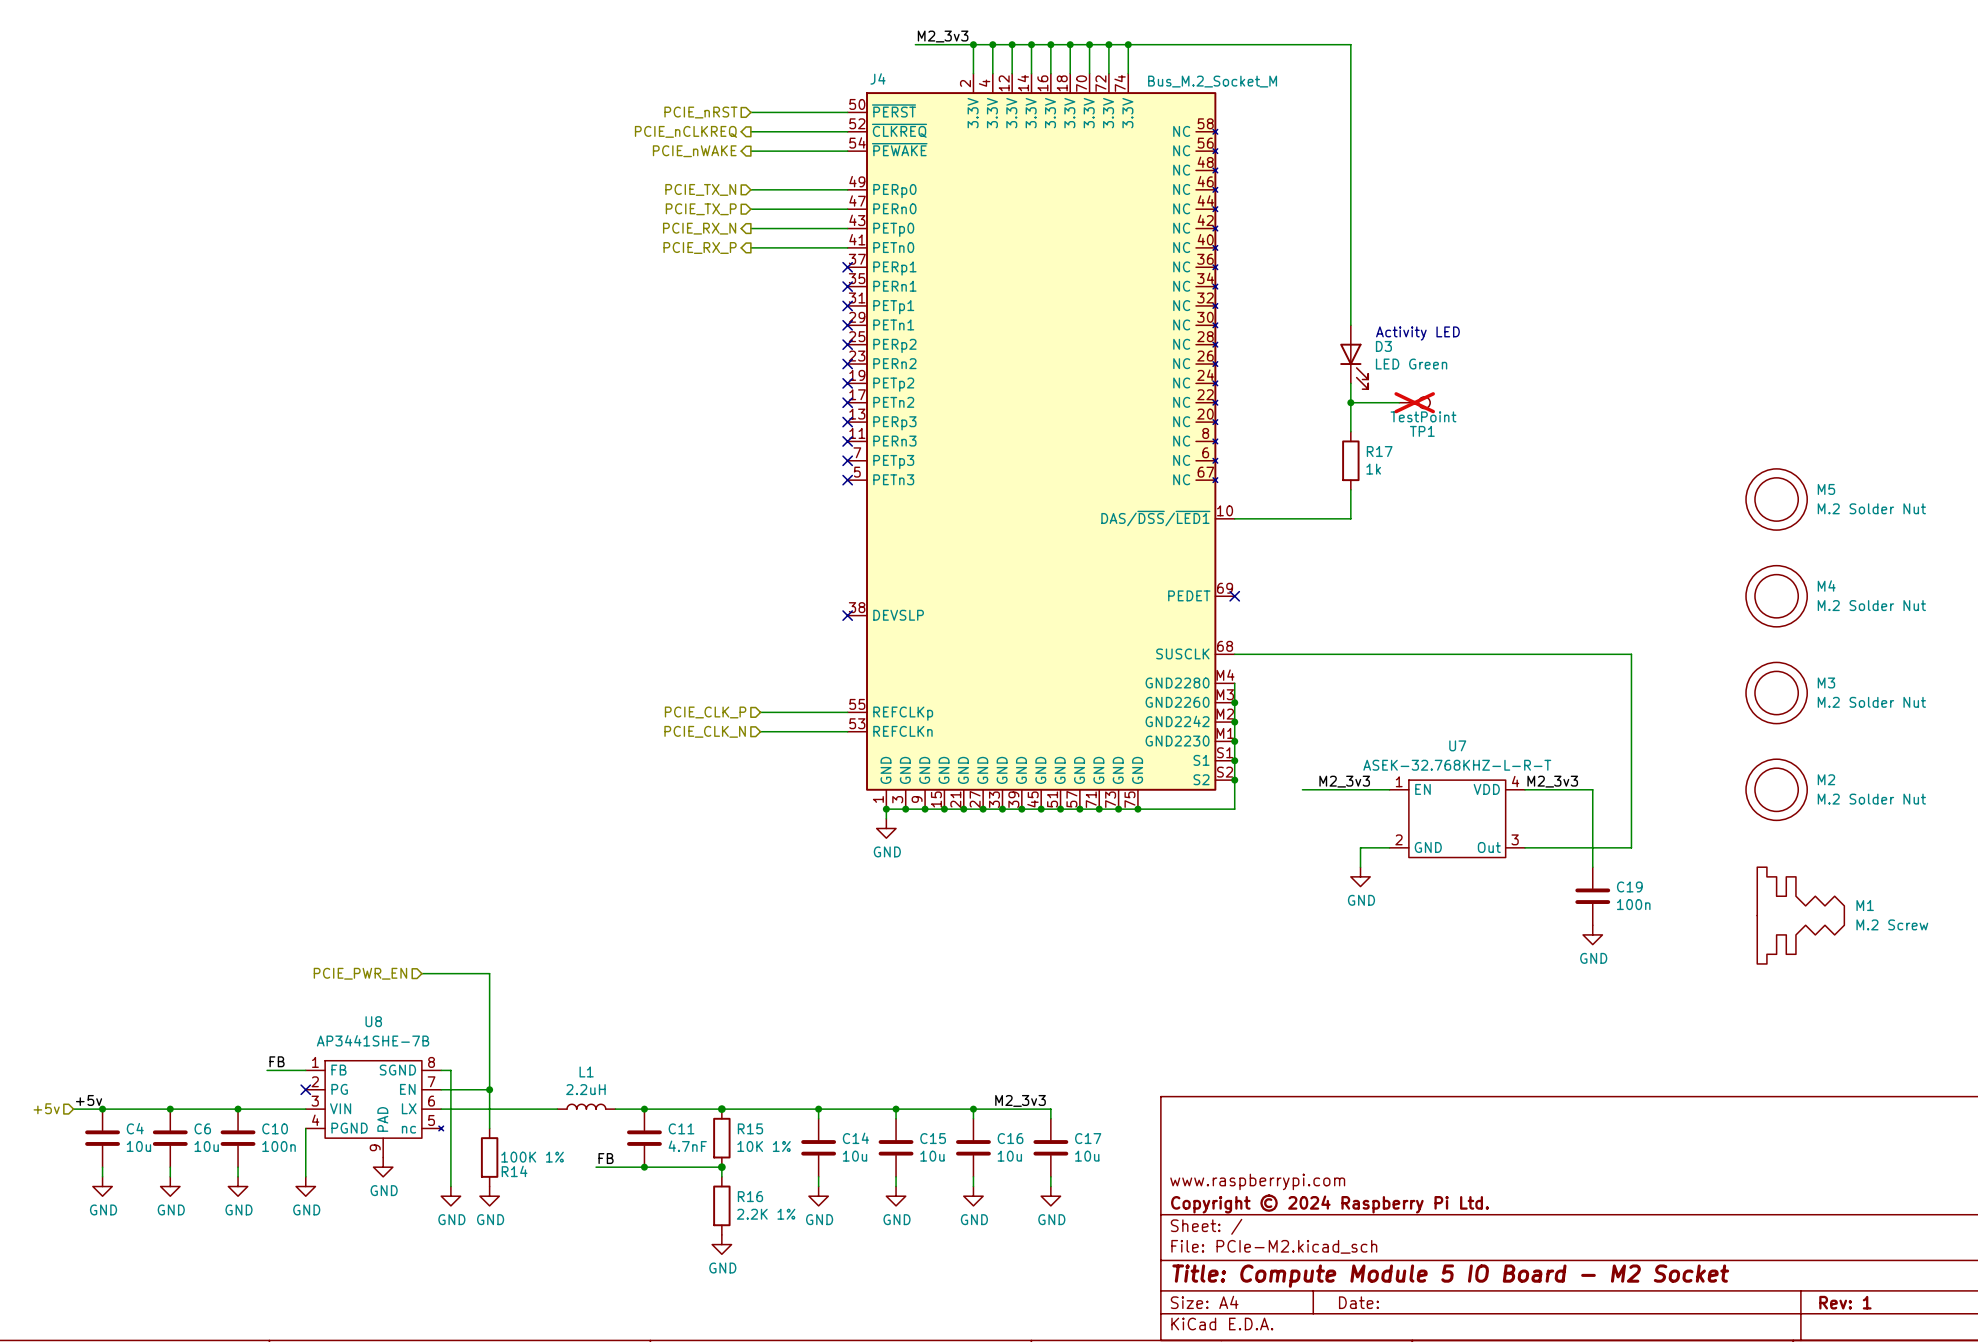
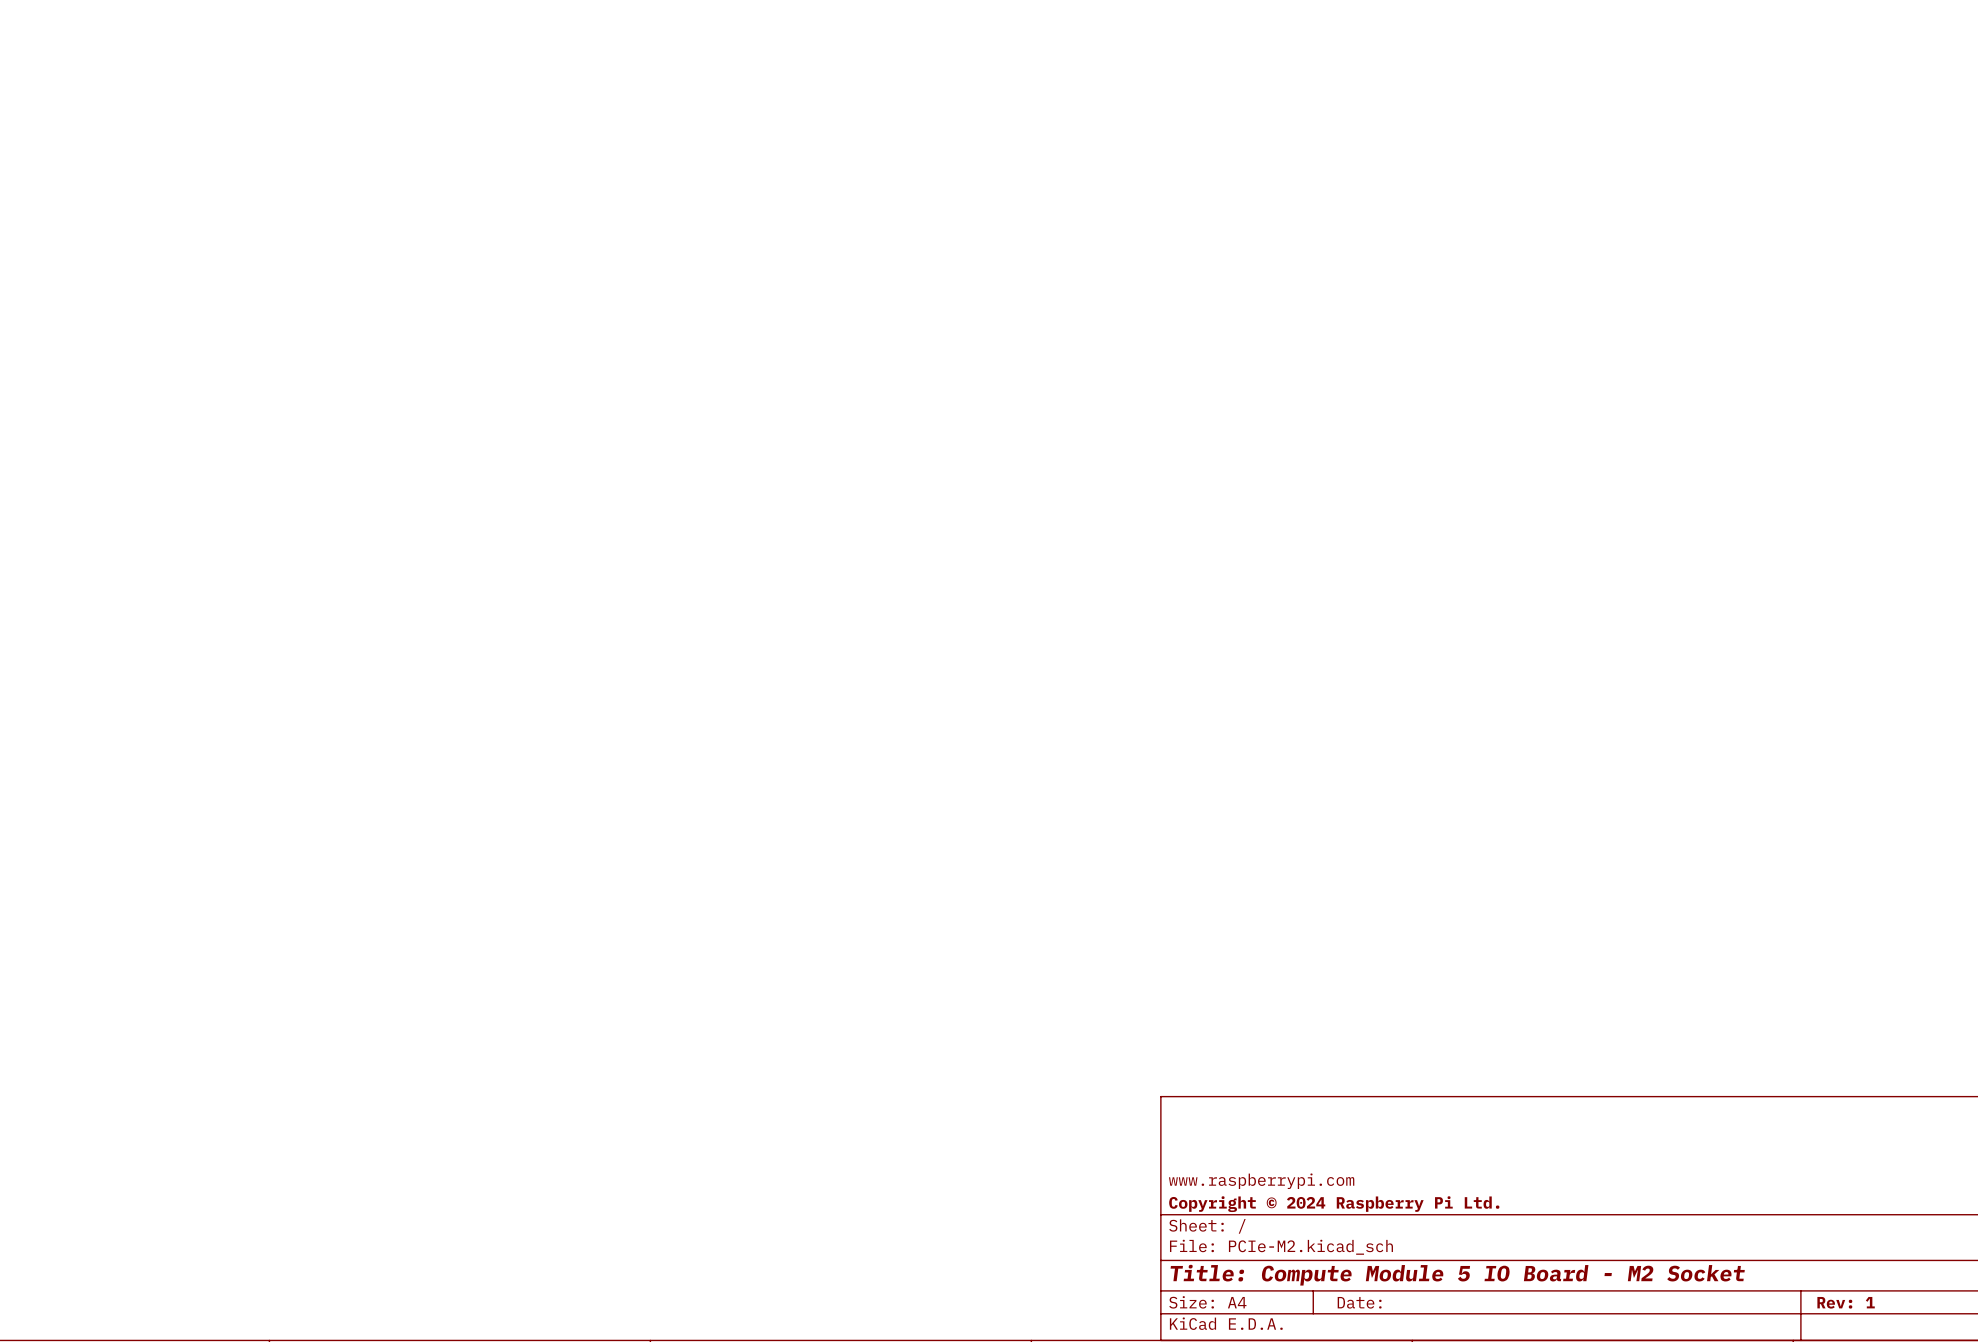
label: M2_3v3 (943, 36) -> none
wire: (915, 44) (1350, 44) (1350, 325) -> none
wire: (973, 44) (973, 73) -> none
junction: (973, 44) -> none
wire: (992, 44) (992, 73) -> none
junction: (992, 44) -> none
wire: (1012, 44) (1012, 73) -> none
junction: (1012, 44) -> none
wire: (1031, 44) (1031, 73) -> none
junction: (1031, 44) -> none
wire: (1050, 44) (1050, 73) -> none
junction: (1050, 44) -> none
wire: (1070, 44) (1070, 73) -> none
junction: (1070, 44) -> none
wire: (1089, 44) (1089, 73) -> none
junction: (1089, 44) -> none
wire: (1108, 44) (1108, 73) -> none
junction: (1108, 44) -> none
wire: (1128, 44) (1128, 73) -> none
junction: (1128, 44) -> none
hierarchical label: PCIE_nRST (700, 112) -> none
wire: (750, 112) (847, 112) -> none
hierarchical label: PCIE_nCLKREQ (685, 131) -> none
wire: (750, 131) (847, 131) -> none
hierarchical label: PCIE_nWAKE (694, 151) -> none
wire: (750, 151) (847, 151) -> none
hierarchical label: PCIE_TX_N (700, 189) -> none
wire: (750, 189) (847, 189) -> none
hierarchical label: PCIE_TX_P (701, 209) -> none
wire: (750, 209) (847, 209) -> none
hierarchical label: PCIE_RX_N (699, 228) -> none
wire: (750, 228) (847, 228) -> none
wire: (750, 247) (847, 247) -> none
hierarchical label: PCIE_RX_P (700, 248) -> none
no-connect mark: (847, 267) -> none
no-connect mark: (847, 286) -> none
no-connect mark: (847, 305) -> none
no-connect mark: (847, 325) -> none
text: Activity LED (1417, 333) -> none
no-connect mark: (847, 344) -> none
D3: LED Green (1354, 357) -> none
no-connect mark: (847, 364) -> none
no-connect mark: (847, 383) -> none
wire: (1350, 383) (1350, 431) -> none
no-connect mark: (847, 402) -> none
wire: (1350, 402) (1399, 402) -> none
junction: (1350, 402) -> none
TP1: TestPoint (1414, 402) -> none
no-connect mark: (847, 422) -> none
no-connect mark: (847, 441) -> none
J4: Bus_M.2_Socket_M (1041, 441) -> none
no-connect mark: (847, 460) -> none
R17: 1k (1350, 460) -> none
no-connect mark: (847, 480) -> none
wire: (1350, 489) (1350, 518) (1234, 518) -> none
M5: M.2 Solder Nut (1776, 499) -> none
no-connect mark: (1234, 596) -> none
M4: M.2 Solder Nut (1776, 596) -> none
no-connect mark: (847, 615) -> none
wire: (1234, 654) (1631, 654) (1631, 847) (1525, 847) -> none
wire: (1234, 683) (1234, 809) (886, 809) (886, 818) -> none
M3: M.2 Solder Nut (1776, 693) -> none
junction: (1234, 702) -> none
hierarchical label: PCIE_CLK_P (705, 712) -> none
wire: (760, 712) (847, 712) -> none
junction: (1234, 722) -> none
hierarchical label: PCIE_CLK_N (705, 731) -> none
wire: (760, 731) (847, 731) -> none
junction: (1234, 741) -> none
junction: (1234, 760) -> none
junction: (1234, 780) -> none
label: M2_3v3 (1344, 781) -> none
label: M2_3v3 (1552, 781) -> none
wire: (1302, 789) (1389, 789) -> none
wire: (1525, 789) (1592, 789) (1592, 867) -> none
M2: M.2 Solder Nut (1776, 789) -> none
junction: (886, 809) -> none
junction: (905, 809) -> none
junction: (925, 809) -> none
junction: (944, 809) -> none
junction: (963, 809) -> none
junction: (983, 809) -> none
junction: (1002, 809) -> none
junction: (1021, 809) -> none
junction: (1041, 809) -> none
junction: (1060, 809) -> none
junction: (1079, 809) -> none
junction: (1099, 809) -> none
junction: (1118, 809) -> none
junction: (1137, 809) -> none
U7: ASEK-32.768KHZ-L-R-T (1457, 818) -> none
power symbol: GND (886, 828) -> none
wire: (1389, 847) (1360, 847) (1360, 867) -> none
power symbol: GND (1360, 876) -> none
C19: 100n (1592, 896) -> none
M1: M.2 Screw (1800, 915) -> none
power symbol: GND (1592, 934) -> none
hierarchical label: PCIE_PWR_EN (360, 973) -> none
wire: (421, 973) (489, 973) (489, 1128) -> none
label: FB (277, 1061) -> none
wire: (267, 1070) (305, 1070) -> none
wire: (441, 1070) (450, 1070) (450, 1186) -> none
no-connect mark: (305, 1089) -> none
wire: (441, 1089) (489, 1089) -> none
junction: (489, 1089) -> none
label: +5v (89, 1100) -> none
label: M2_3v3 (1020, 1100) -> none
L1: 2.2uH (586, 1106) -> none
hierarchical label: +5v (46, 1108) -> none
wire: (73, 1109) (305, 1109) -> none
junction: (102, 1109) -> none
junction: (170, 1109) -> none
junction: (238, 1109) -> none
U8: AP3441SHE-7B (374, 1109) -> none
wire: (441, 1109) (557, 1109) -> none
wire: (615, 1109) (1050, 1109) (1050, 1118) -> none
junction: (644, 1109) -> none
junction: (721, 1109) -> none
wire: (818, 1109) (818, 1118) -> none
junction: (818, 1109) -> none
wire: (896, 1109) (896, 1118) -> none
junction: (896, 1109) -> none
wire: (973, 1109) (973, 1118) -> none
junction: (973, 1109) -> none
wire: (305, 1128) (305, 1176) -> none
C4: 10u (102, 1138) -> none
C6: 10u (170, 1138) -> none
C10: 100n (238, 1138) -> none
C11: 4.7nF (644, 1138) -> none
R15: 10K 1% (721, 1138) -> none
C14: 10u (818, 1147) -> none
C15: 10u (896, 1147) -> none
C16: 10u (973, 1147) -> none
C17: 10u (1050, 1147) -> none
R14: 100K 1% (489, 1157) -> none
label: FB (606, 1158) -> none
wire: (102, 1167) (102, 1176) -> none
wire: (170, 1167) (170, 1176) -> none
wire: (238, 1167) (238, 1176) -> none
power symbol: GND (383, 1167) -> none
wire: (596, 1167) (721, 1167) (721, 1176) -> none
junction: (644, 1167) -> none
junction: (721, 1167) -> none
wire: (818, 1176) (818, 1186) -> none
wire: (896, 1176) (896, 1186) -> none
wire: (973, 1176) (973, 1186) -> none
wire: (1050, 1176) (1050, 1186) -> none
power symbol: GND (102, 1186) -> none
power symbol: GND (170, 1186) -> none
power symbol: GND (238, 1186) -> none
power symbol: GND (305, 1186) -> none
power symbol: GND (450, 1196) -> none
power symbol: GND (489, 1196) -> none
power symbol: GND (818, 1196) -> none
power symbol: GND (896, 1196) -> none
power symbol: GND (973, 1196) -> none
power symbol: GND (1050, 1196) -> none
R16: 2.2K 1% (721, 1205) -> none
power symbol: GND (721, 1244) -> none

